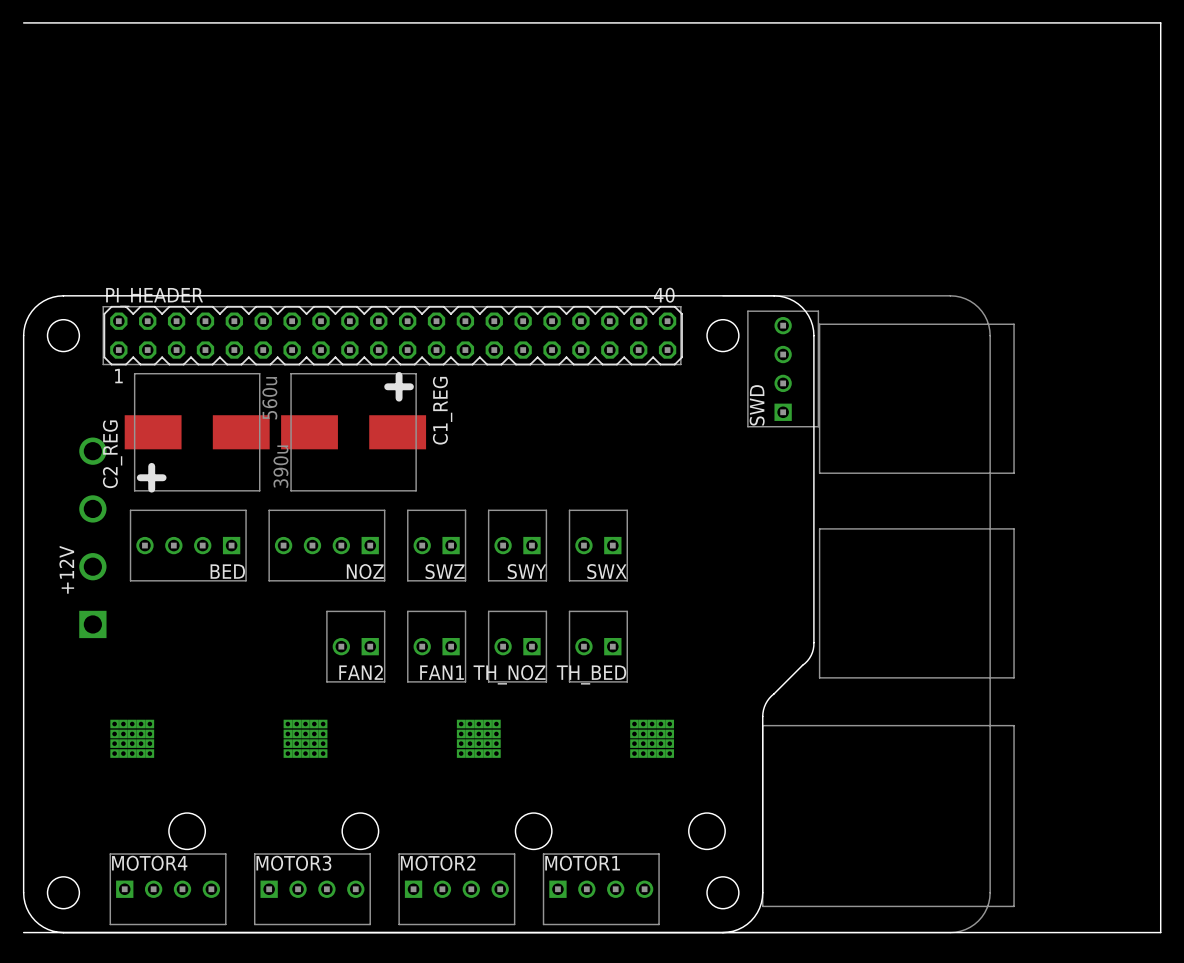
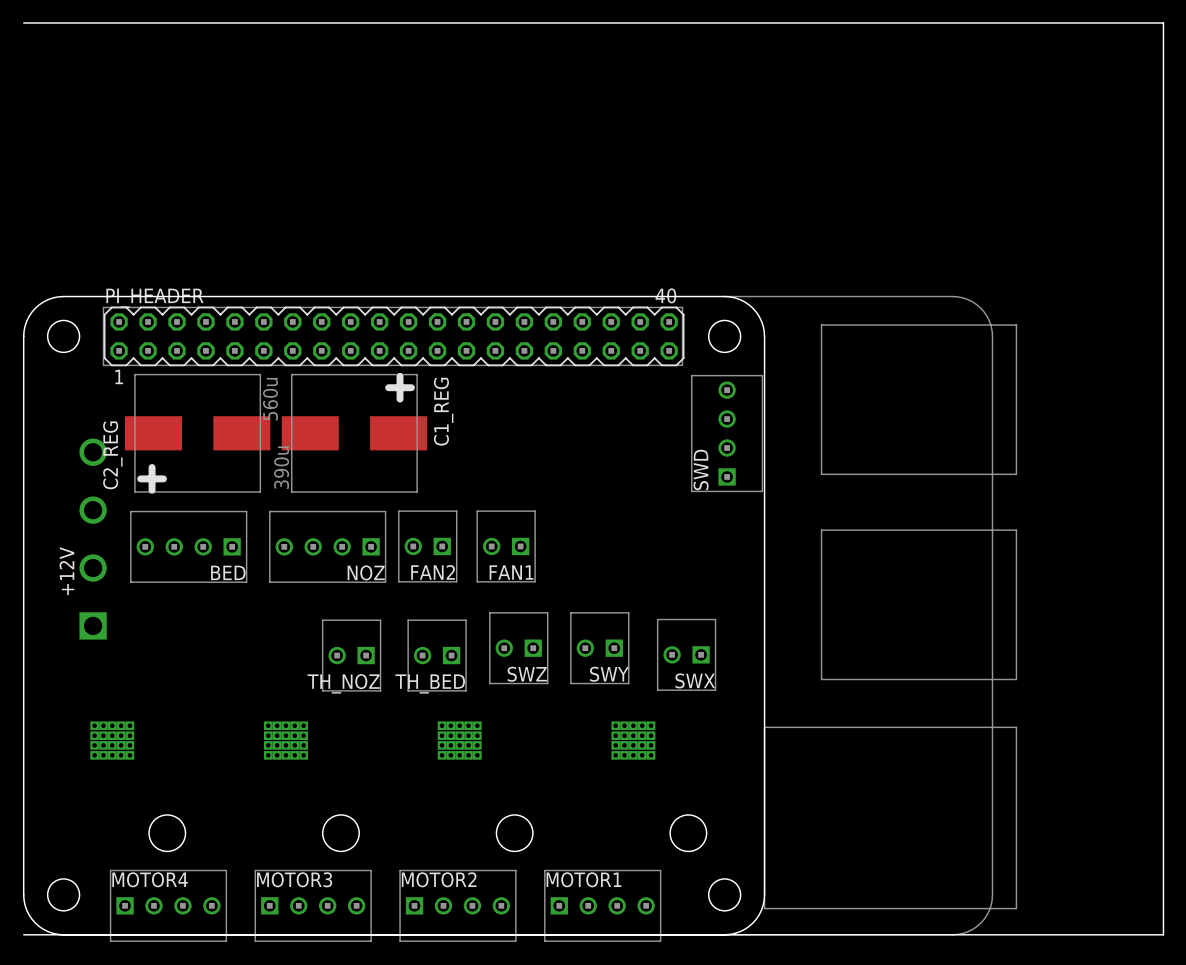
drawing shape: [22, 295, 1015, 934] -> [22, 295, 1018, 936]
SWD position: (783, 368) -> (727, 433)
SWZ: (436, 545) -> none
SWY: (517, 545) -> none
SWX position: (598, 545) -> (686, 654)
FAN2 position: (355, 646) -> (427, 546)
FAN1 position: (436, 646) -> (506, 546)
TH_NOZ: none -> (351, 655)
TH_BED: none -> (437, 655)
TH_NOZ name: TH_NOZ (509, 674) -> SWZ (527, 674)
TH_BED name: TH_BED (591, 674) -> SWY (609, 674)
part position: (132, 738) -> (112, 740)
part position: (305, 738) -> (285, 740)
part position: (478, 738) -> (459, 740)
part position: (652, 738) -> (633, 740)
part position: (187, 831) -> (167, 833)
part position: (360, 831) -> (340, 833)
part position: (533, 831) -> (514, 833)
part position: (706, 831) -> (688, 833)
MOTOR4 position: (168, 889) -> (168, 905)
MOTOR3 position: (312, 889) -> (313, 905)
MOTOR2 position: (456, 889) -> (457, 905)
MOTOR1 position: (601, 889) -> (602, 905)

